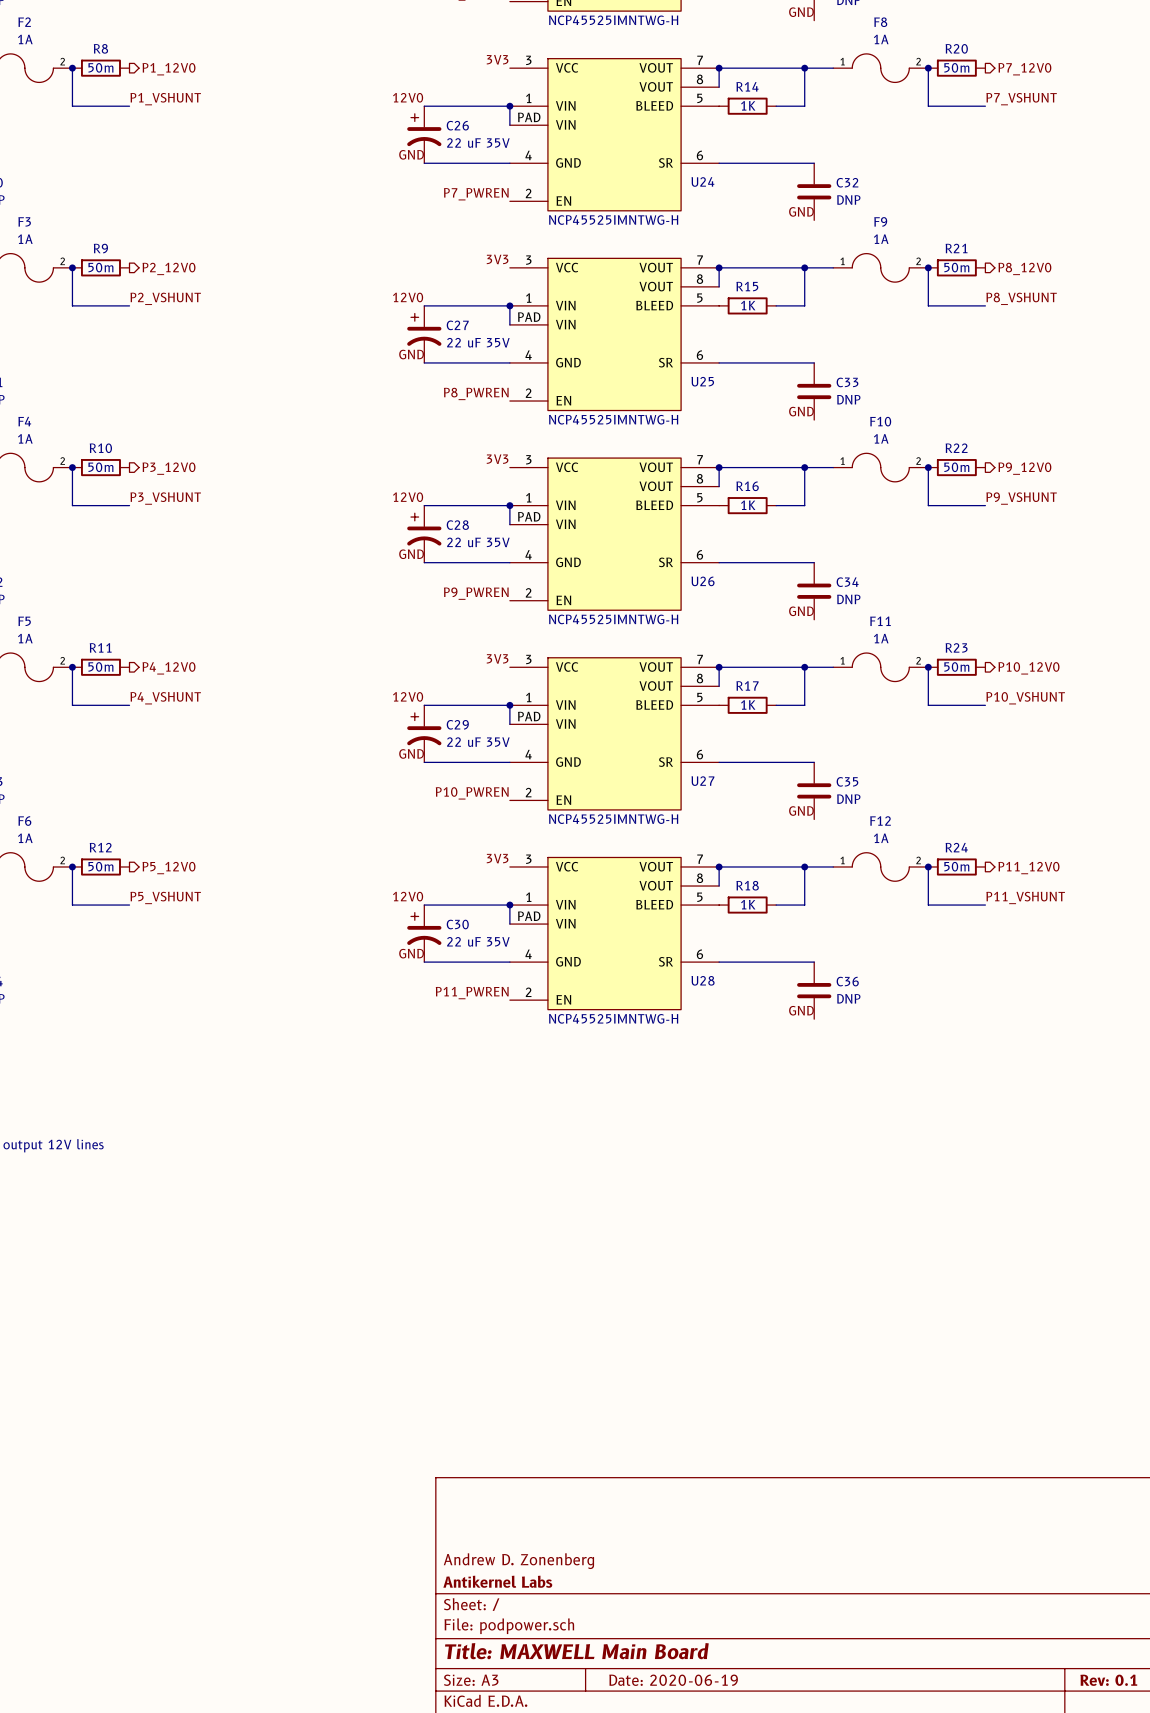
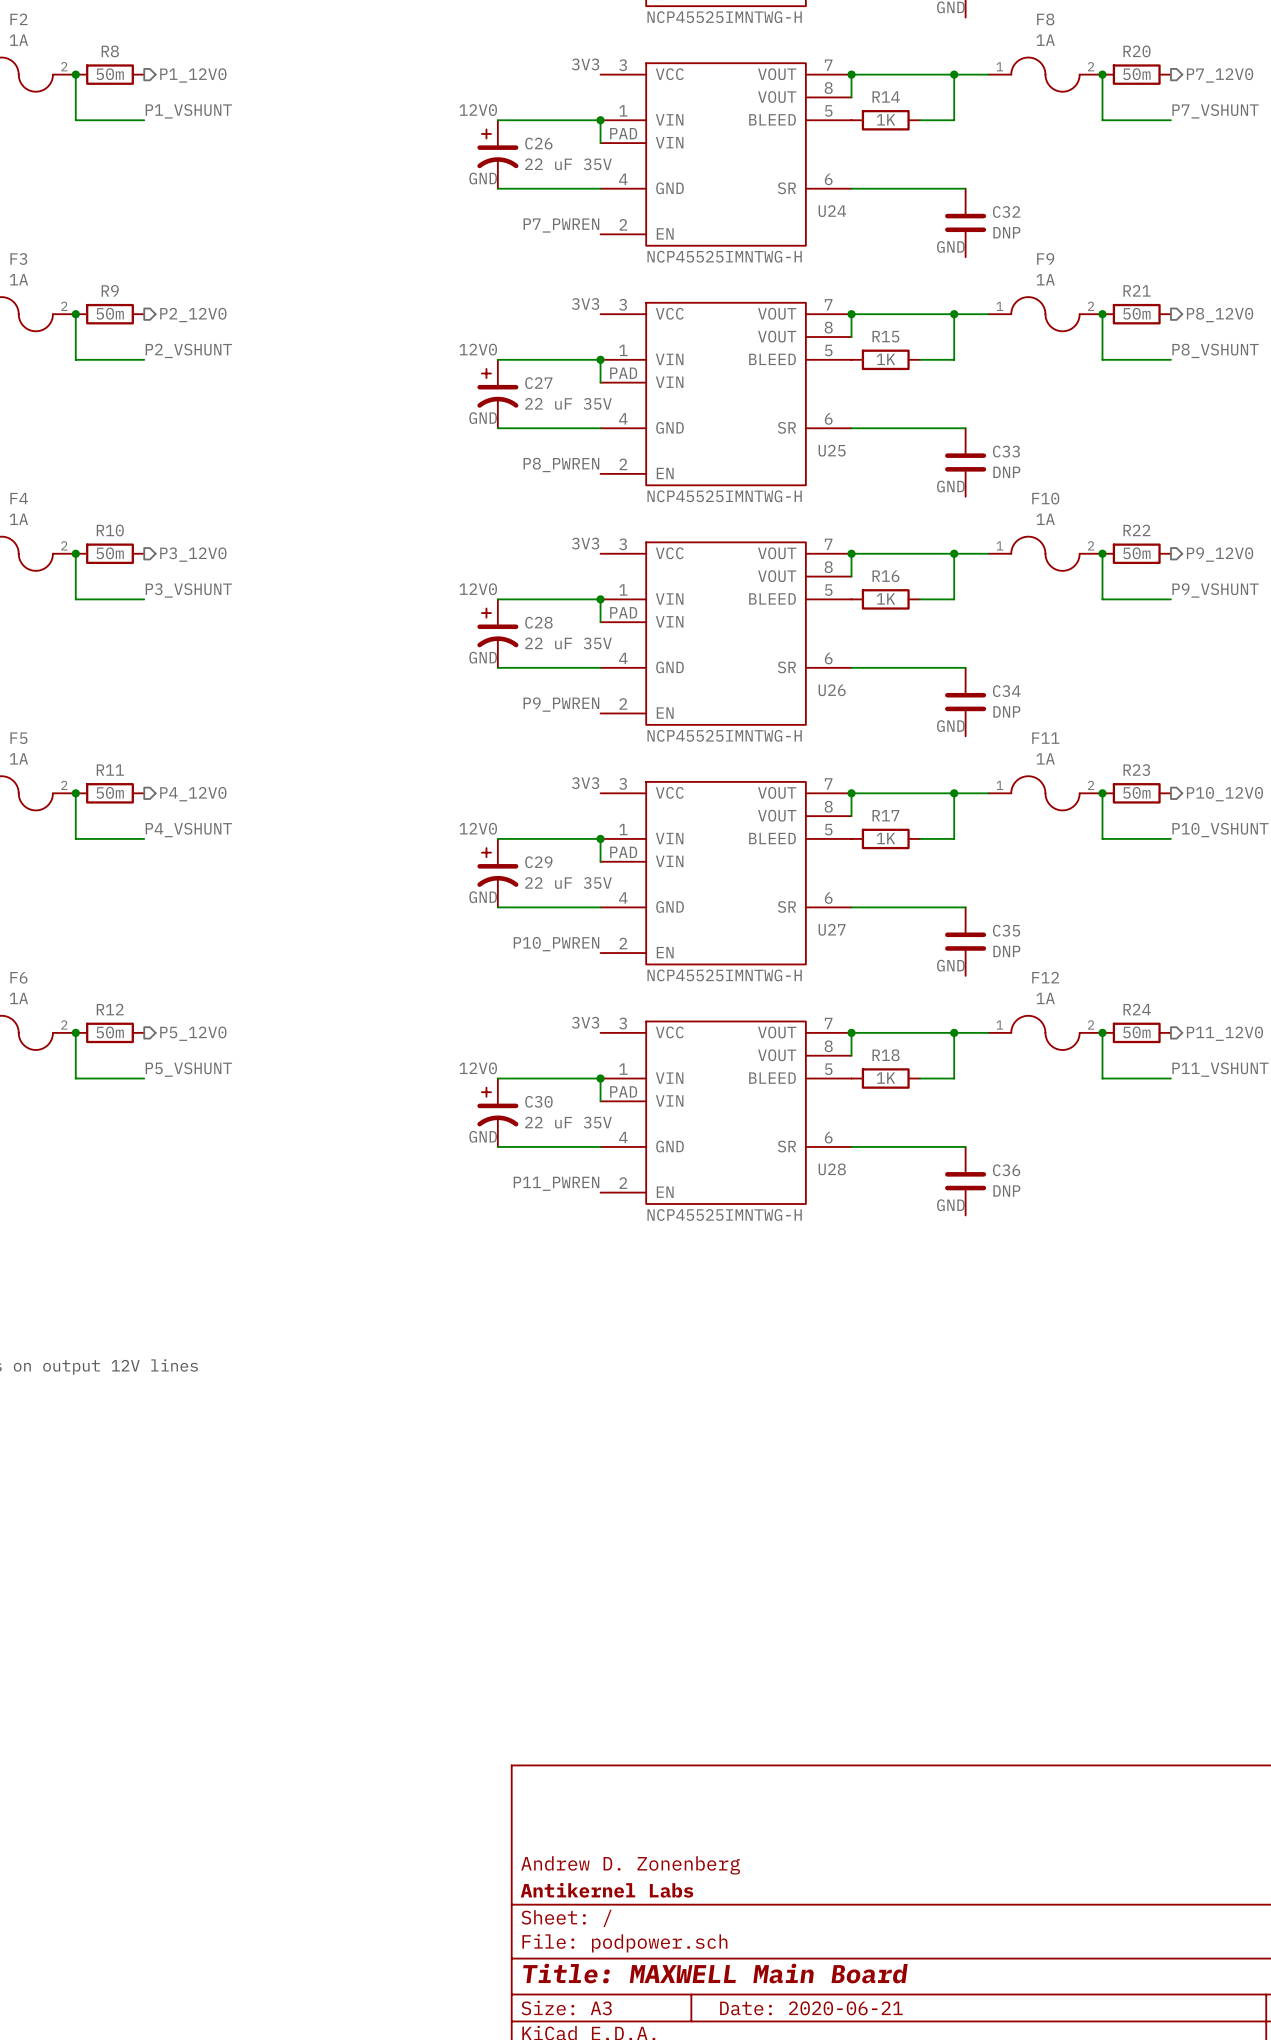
title block: Date: 2020-06-19 (673, 1680) -> Date: 2020-06-21 (811, 2008)

